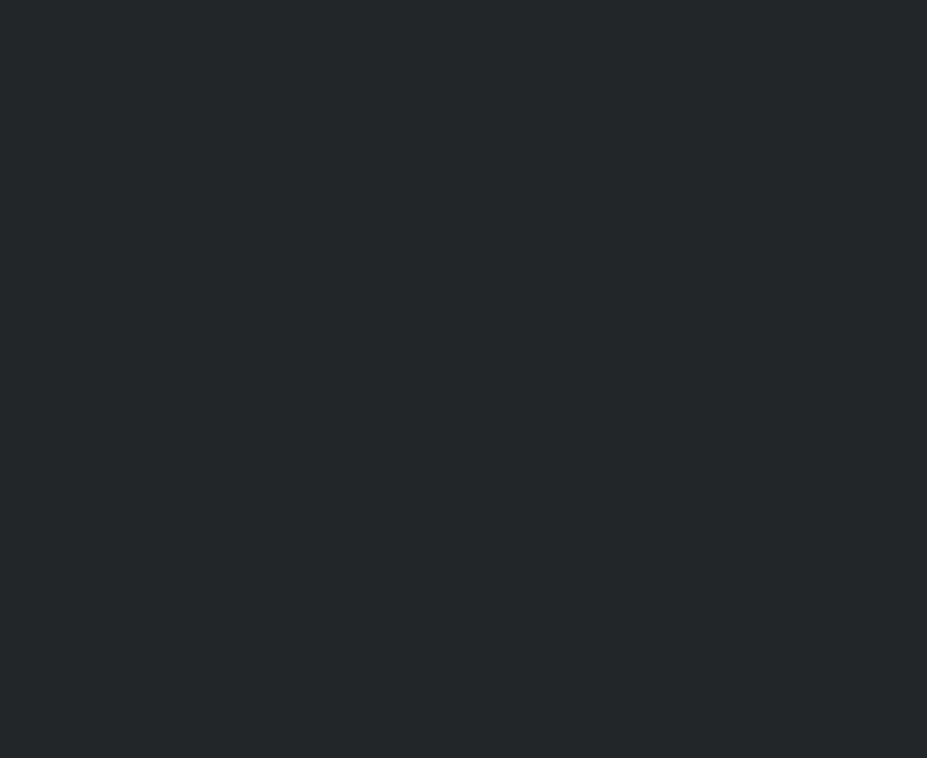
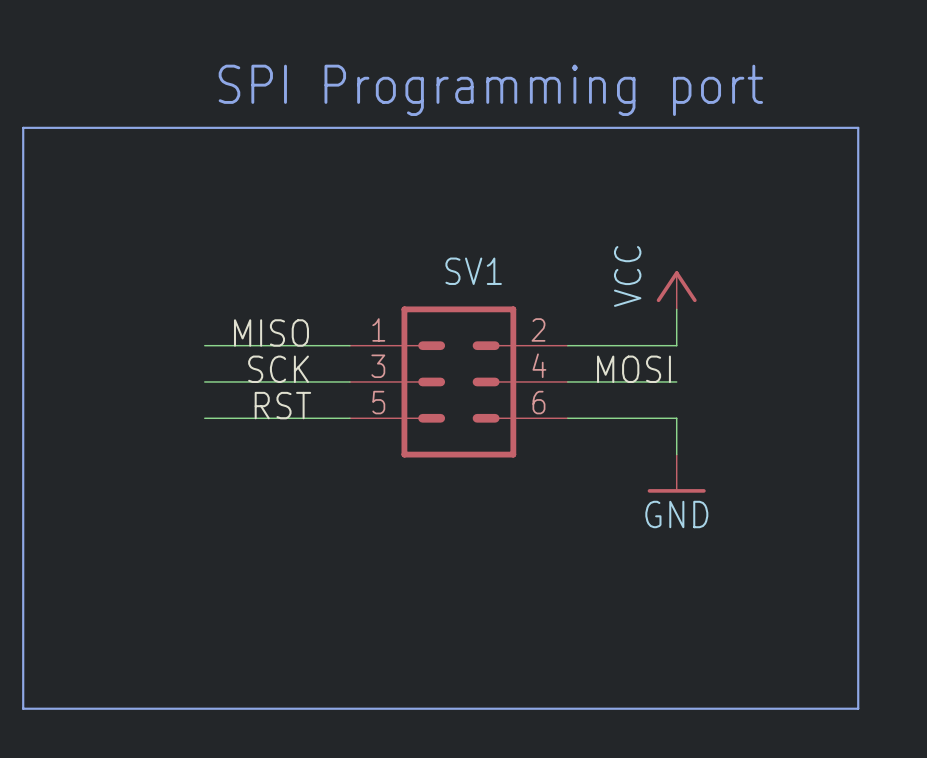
text: none -> SPI Programming port (490, 90)
line: none -> (23, 127) (23, 708) (858, 708) (858, 127) (23, 127)
power symbol: none -> VCC (676, 290)
wire: none -> (676, 309) (676, 345) (567, 345)
label: none -> MISO (271, 332)
wire: none -> (204, 345) (349, 345)
label: none -> SCK (278, 369)
label: none -> MOSI (633, 369)
wire: none -> (204, 381) (349, 381)
SV1: none -> (458, 381)
wire: none -> (567, 381) (676, 381)
label: none -> RST (282, 405)
wire: none -> (204, 418) (349, 418)
wire: none -> (567, 418) (676, 418) (676, 454)
power symbol: none -> GND (676, 473)

